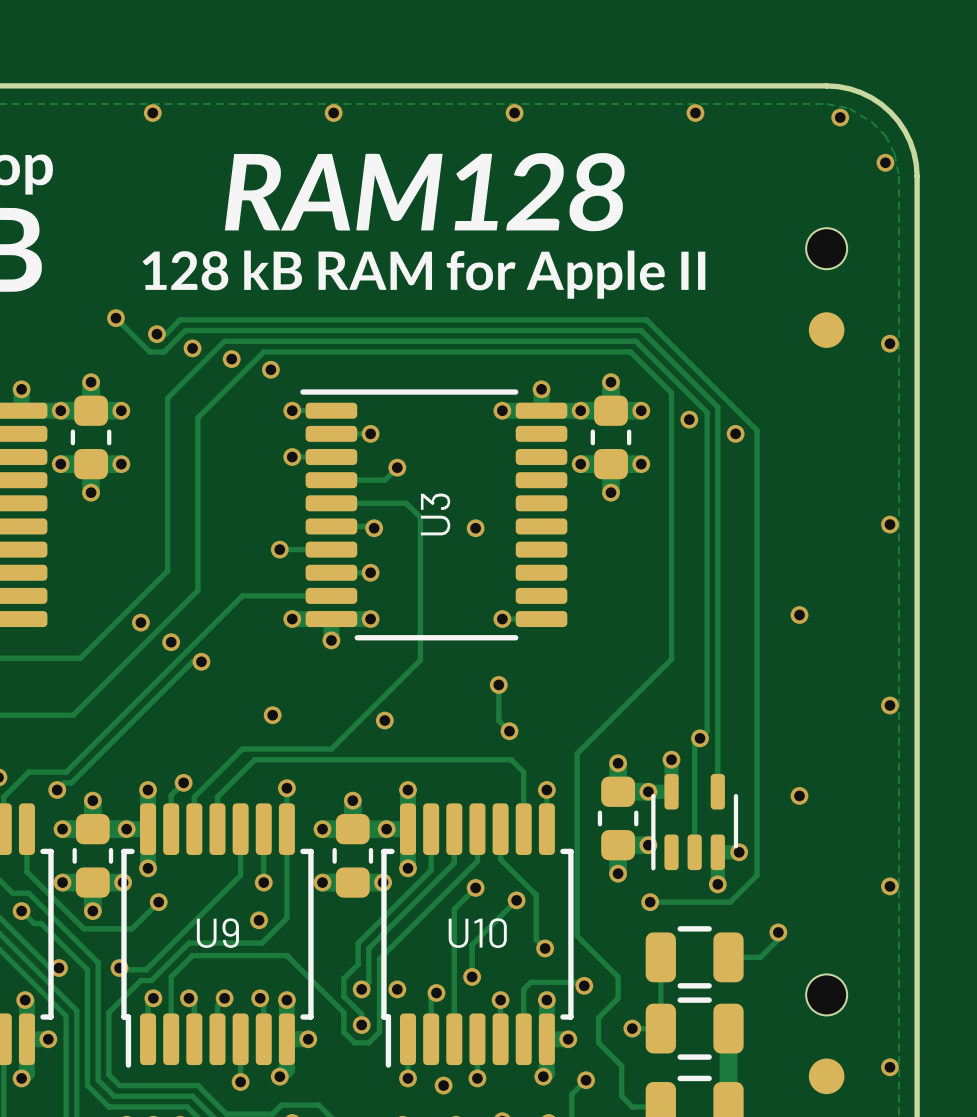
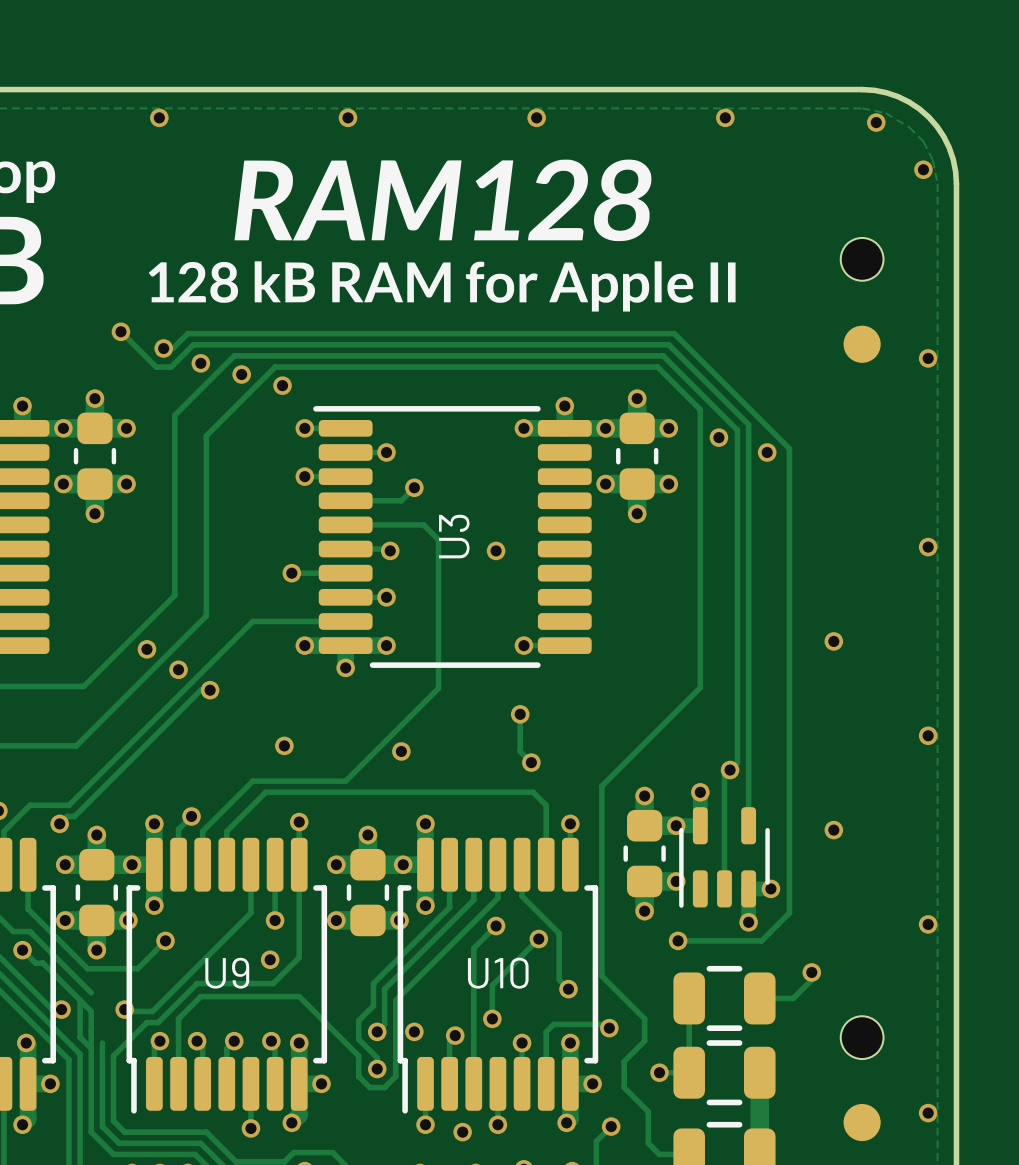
track: (87, 952) (98, 962) (98, 1000) -> none
track: none -> (80, 1000) (80, 1037) (91, 1048)

